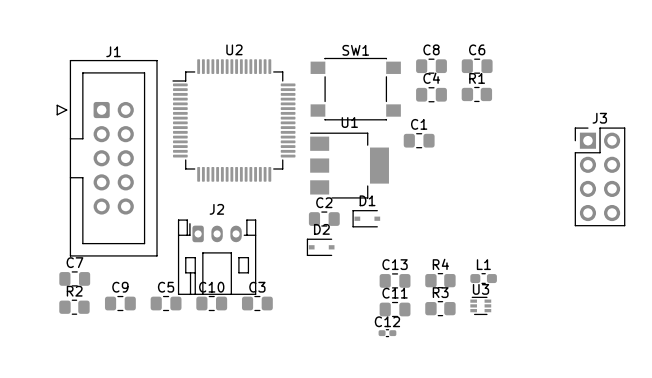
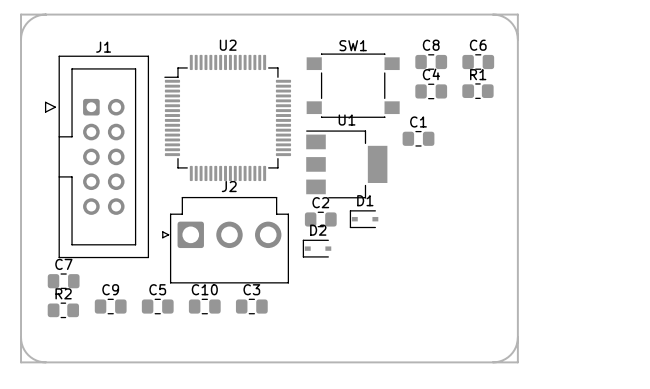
track: none -> (21, 14) (517, 14) (517, 362) (21, 362) (21, 14)
track: none -> (45, 14) (36, 16) (28, 21) (22, 29) (21, 39)
track: none -> (493, 14) (502, 16) (510, 21) (515, 29) (517, 39)
J3: (600, 176) -> none
J2 footprint: [177, 219, 257, 295] -> [162, 196, 289, 284]
L1: (483, 278) -> none
C13: (395, 280) -> none
R4: (440, 280) -> none
U3: (480, 305) -> none
R3: (440, 308) -> none
C11: (395, 309) -> none
track: none -> (21, 337) (22, 347) (28, 355) (36, 360) (45, 362)
C12: (387, 333) -> none
track: none -> (517, 337) (515, 347) (510, 355) (502, 360) (493, 362)

